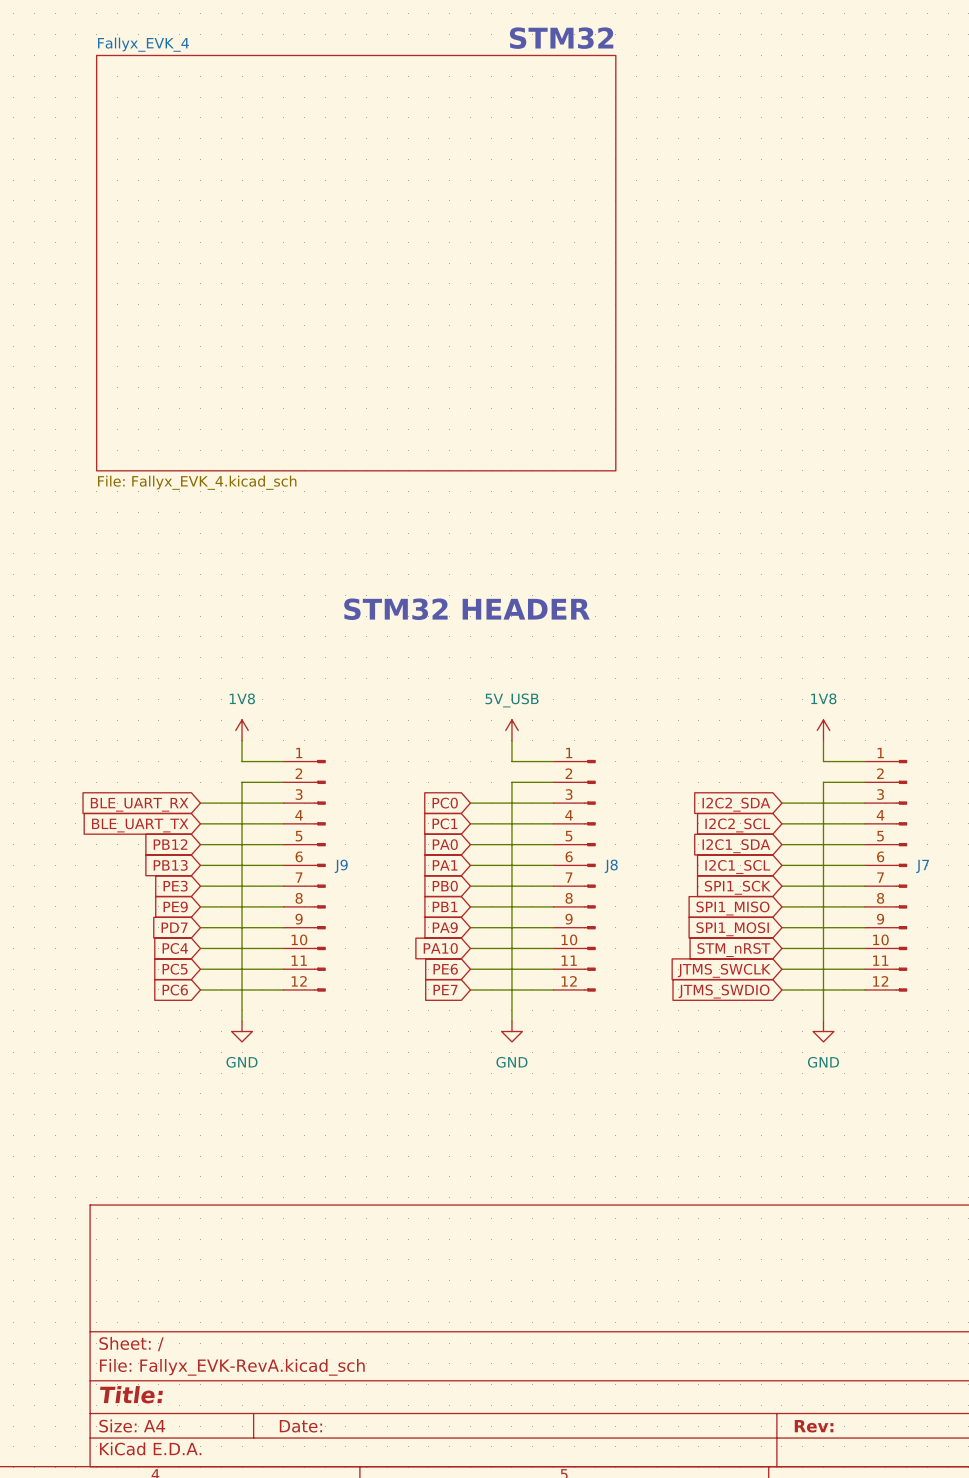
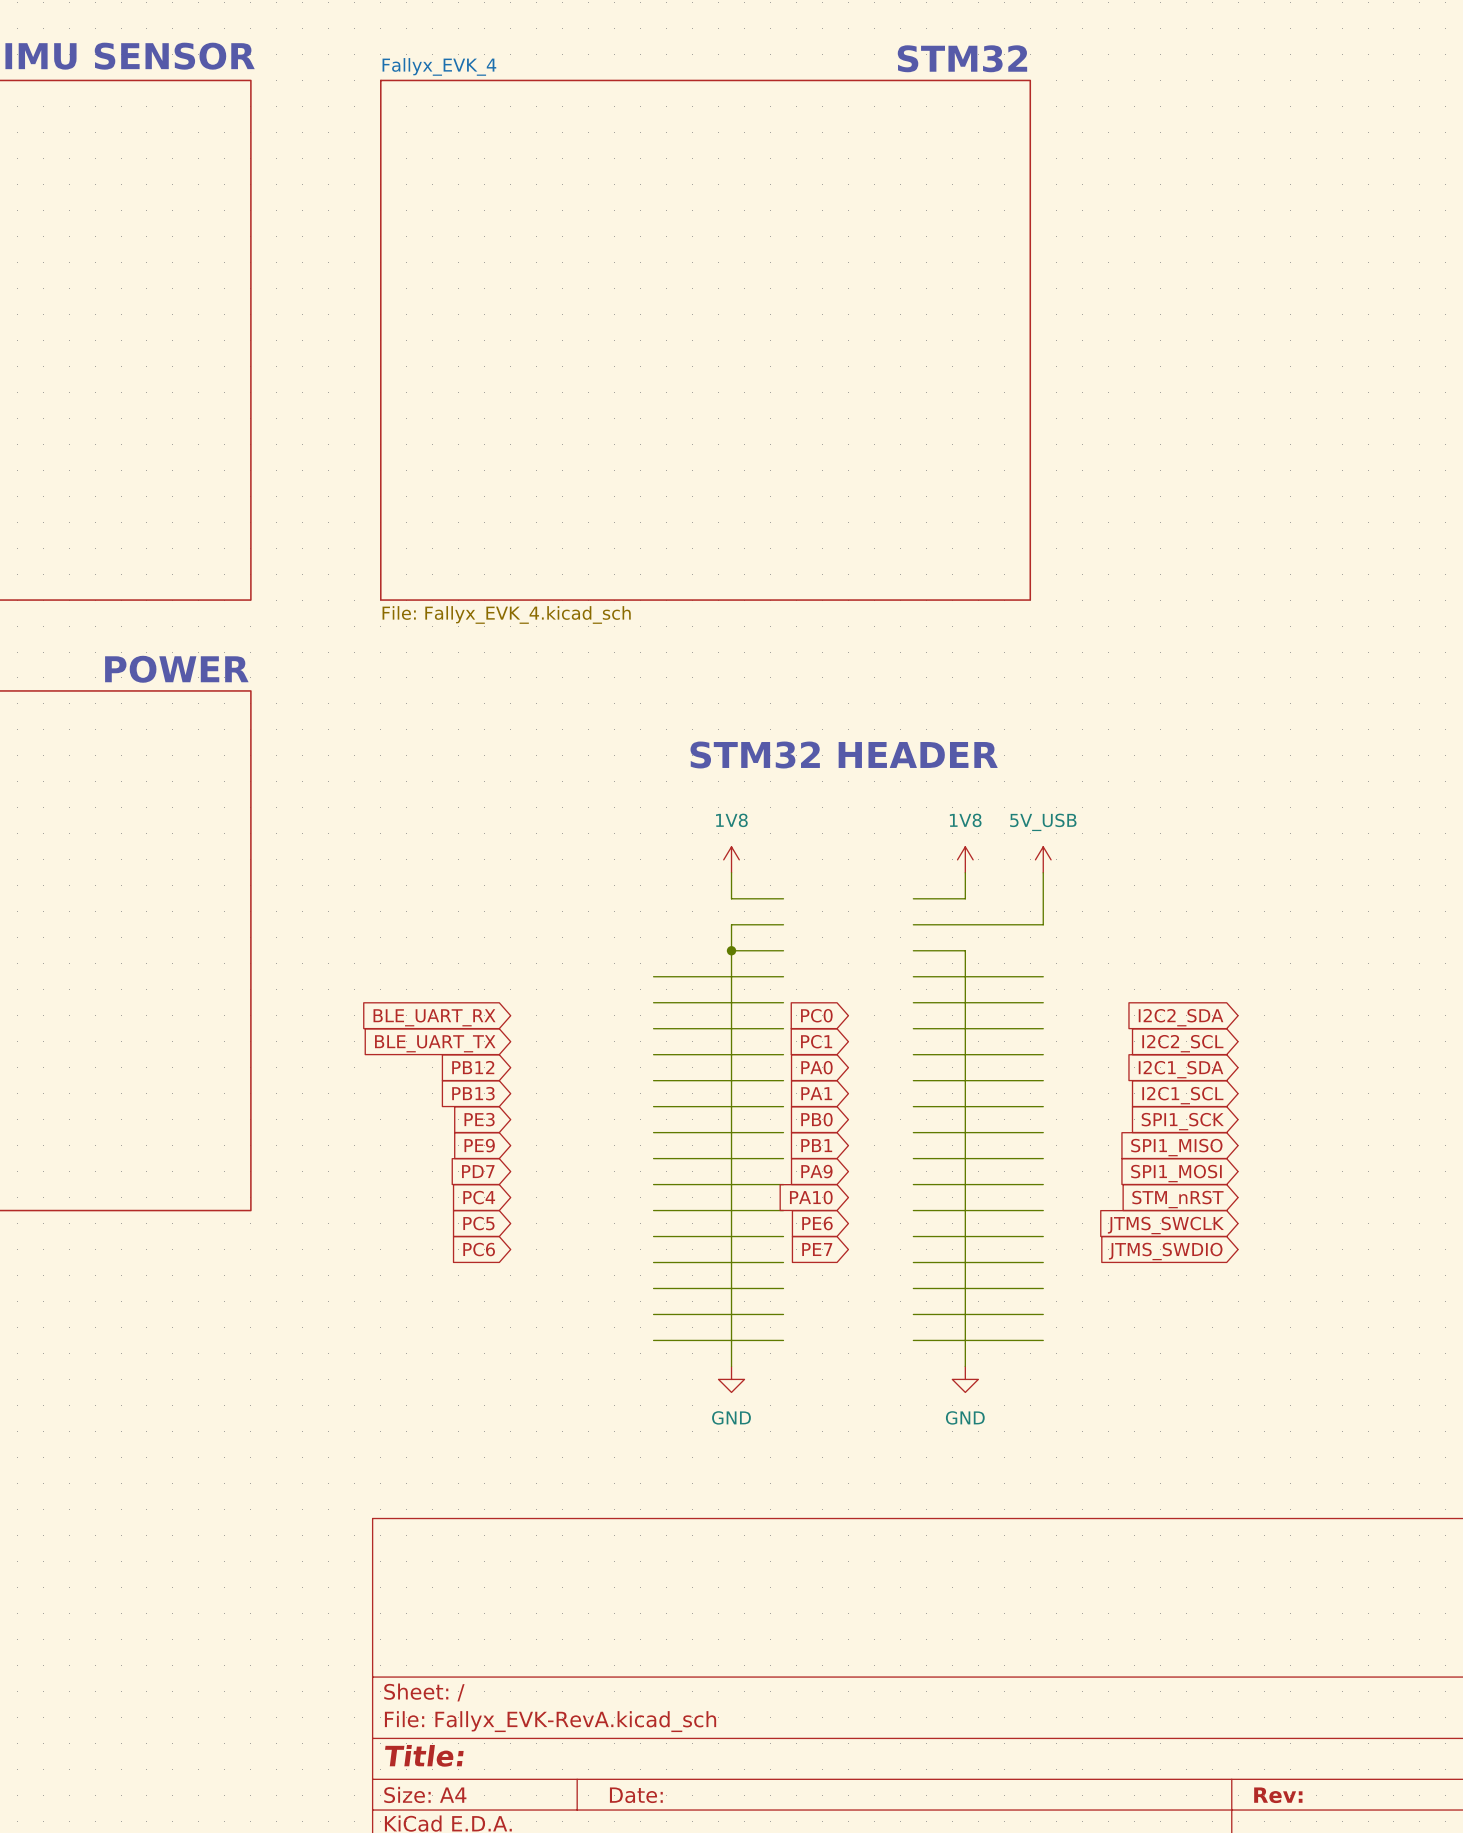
text position: STM32 HEADER (467, 609) -> STM32 HEADER (844, 755)
power symbol: none -> 1V8 (965, 859)
wire: none -> (965, 872) (965, 898) (913, 898)
wire: none -> (1043, 872) (1043, 924) (913, 924)
power symbol position: 1V8 (242, 730) -> 1V8 (731, 859)
wire: none -> (783, 924) (731, 924) (731, 1366)
power symbol position: 5V_USB (511, 730) -> 5V_USB (1043, 859)
power symbol: 1V8 (823, 730) -> none
wire: (242, 740) (242, 761) (283, 761) -> (731, 872) (731, 898) (783, 898)
wire: (511, 740) (511, 761) (553, 761) -> none
wire: (823, 740) (823, 761) (865, 761) -> none
wire: none -> (731, 950) (783, 950)
junction: none -> (731, 950)
wire: none -> (913, 950) (965, 950) (965, 1366)
wire: none -> (653, 976) (783, 976)
wire: none -> (913, 976) (1043, 976)
wire: (283, 782) (242, 782) (242, 1021) -> none
wire: (553, 782) (511, 782) (511, 1021) -> none
wire: (865, 782) (823, 782) (823, 1021) -> none
wire: none -> (653, 1002) (783, 1002)
wire: none -> (913, 1002) (1043, 1002)
wire: (200, 803) (283, 803) -> none
wire: (470, 803) (553, 803) -> none
wire: (781, 803) (865, 803) -> none
wire: none -> (653, 1028) (783, 1028)
wire: none -> (913, 1028) (1043, 1028)
wire: (200, 823) (283, 823) -> none
wire: (470, 823) (553, 823) -> none
wire: (781, 823) (865, 823) -> none
wire: none -> (653, 1054) (783, 1054)
wire: none -> (913, 1054) (1043, 1054)
wire: (200, 844) (283, 844) -> none
wire: (470, 844) (553, 844) -> none
wire: (781, 844) (865, 844) -> none
wire: none -> (653, 1080) (783, 1080)
wire: none -> (913, 1080) (1043, 1080)
wire: (200, 865) (283, 865) -> none
wire: (470, 865) (553, 865) -> none
wire: (781, 865) (865, 865) -> none
J9: (304, 875) -> none
wire: none -> (653, 1106) (783, 1106)
wire: none -> (913, 1106) (1043, 1106)
J8: (574, 875) -> none
J7: (886, 875) -> none
wire: (200, 886) (283, 886) -> none
wire: (470, 886) (553, 886) -> none
wire: (781, 886) (865, 886) -> none
wire: none -> (653, 1132) (783, 1132)
wire: none -> (913, 1132) (1043, 1132)
wire: (200, 906) (283, 906) -> none
wire: (470, 906) (553, 906) -> none
wire: (781, 906) (865, 906) -> none
wire: none -> (653, 1158) (783, 1158)
wire: none -> (913, 1158) (1043, 1158)
wire: (200, 927) (283, 927) -> none
wire: (470, 927) (553, 927) -> none
wire: (781, 927) (865, 927) -> none
wire: none -> (653, 1184) (783, 1184)
wire: none -> (913, 1184) (1043, 1184)
wire: (200, 948) (283, 948) -> none
wire: (470, 948) (553, 948) -> none
wire: (781, 948) (865, 948) -> none
wire: none -> (653, 1210) (783, 1210)
wire: none -> (913, 1210) (1043, 1210)
wire: (200, 969) (283, 969) -> none
wire: (470, 969) (553, 969) -> none
wire: (781, 969) (865, 969) -> none
wire: none -> (653, 1236) (783, 1236)
wire: none -> (913, 1236) (1043, 1236)
wire: (200, 989) (283, 989) -> none
wire: (470, 989) (553, 989) -> none
wire: (781, 989) (865, 989) -> none
wire: none -> (653, 1262) (783, 1262)
wire: none -> (913, 1262) (1043, 1262)
wire: none -> (653, 1288) (783, 1288)
wire: none -> (913, 1288) (1043, 1288)
power symbol: GND (242, 1031) -> none
power symbol: GND (511, 1031) -> none
power symbol: GND (823, 1031) -> none
wire: none -> (653, 1314) (783, 1314)
wire: none -> (913, 1314) (1043, 1314)
wire: none -> (653, 1340) (783, 1340)
wire: none -> (913, 1340) (1043, 1340)
power symbol: none -> GND (731, 1379)
power symbol: none -> GND (965, 1379)

